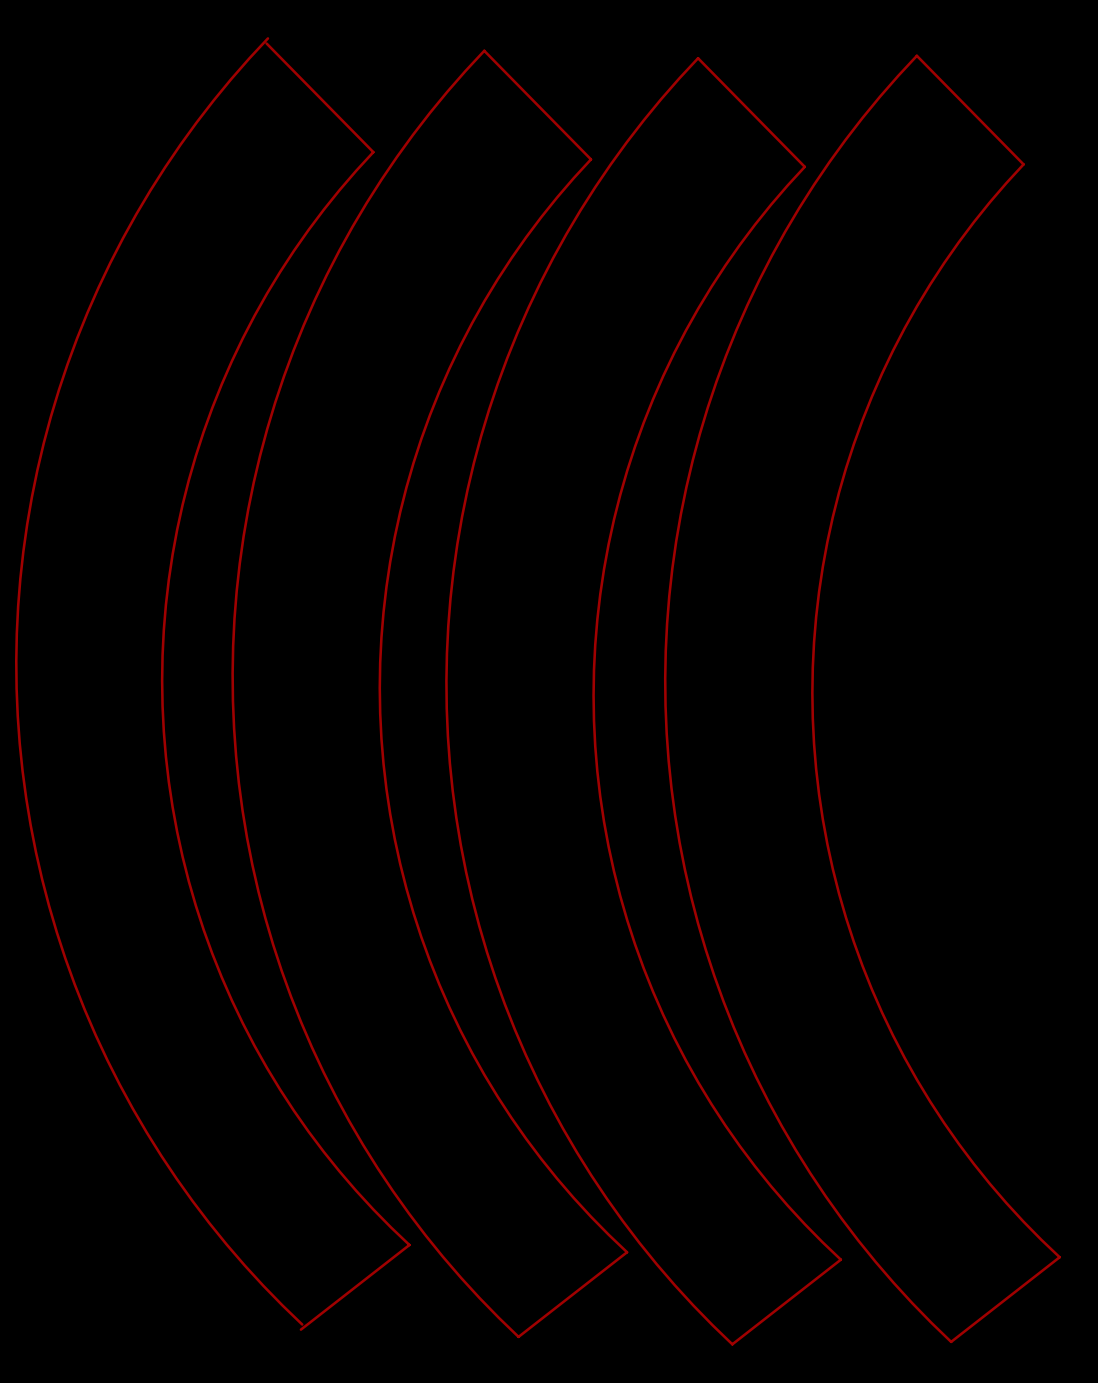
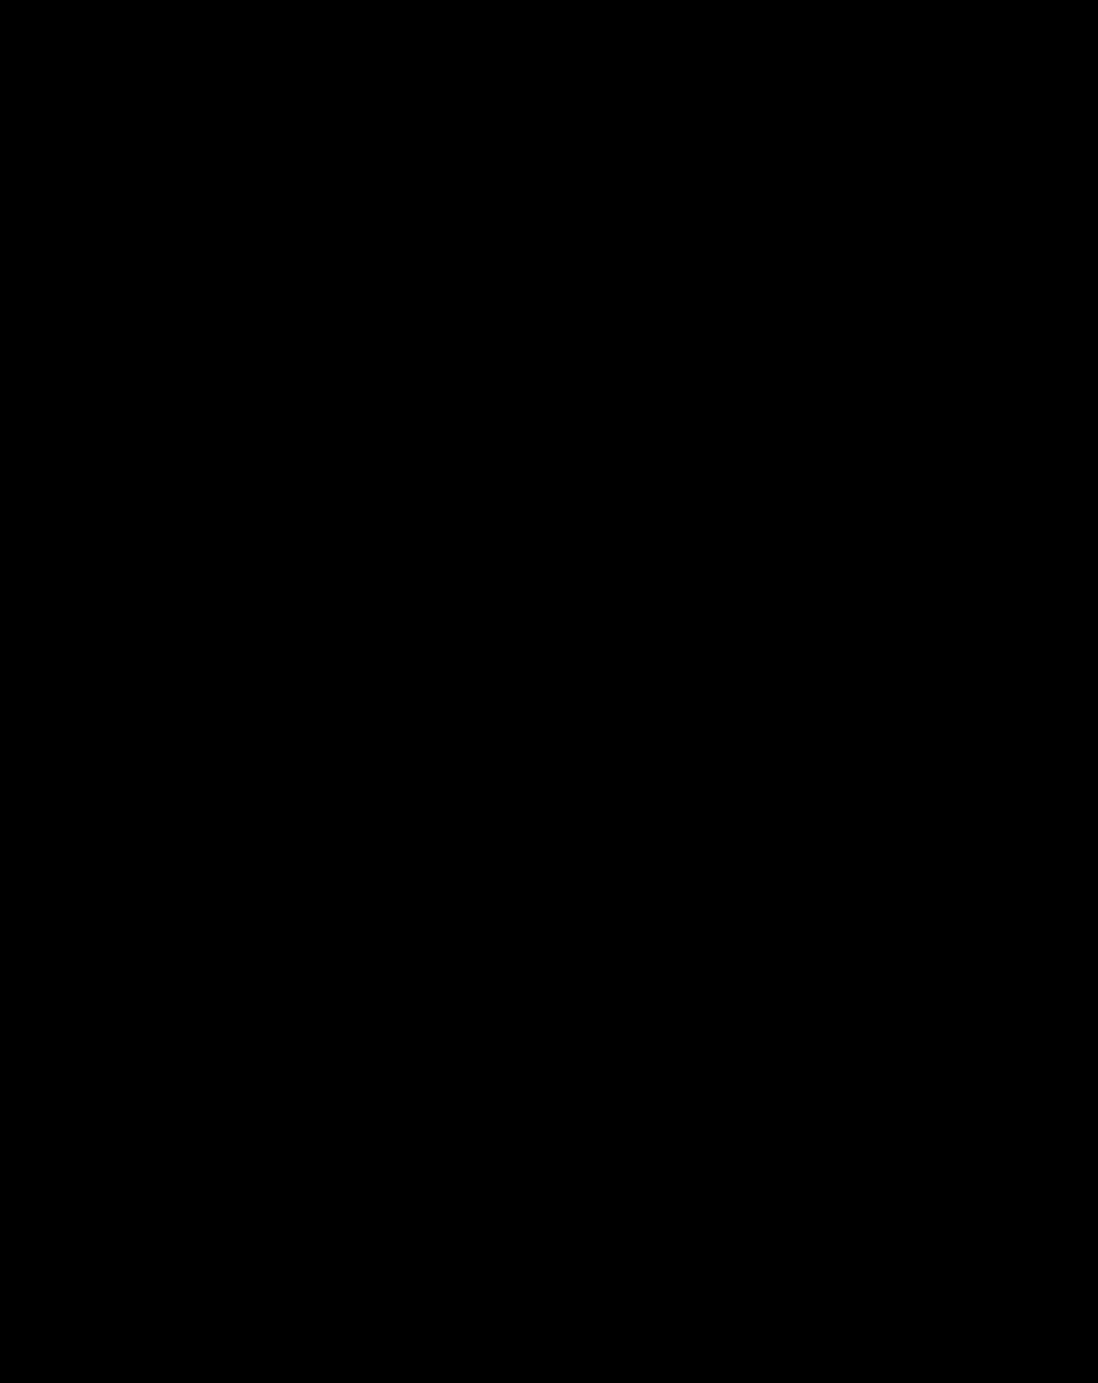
top track: (267, 38) (231, 79) (196, 122) (150, 190) (110, 262) (77, 338) (50, 416) (31, 496) (20, 578) (16, 633) (16, 688) (19, 743) (26, 798) (42, 879) (65, 958) (95, 1035) (119, 1084) (146, 1132) (192, 1201) (244, 1265) (302, 1324) -> none
top track: (266, 43) (373, 152) (323, 209) (280, 272) (242, 338) (212, 407) (188, 480) (172, 554) (163, 630) (162, 706) (168, 781) (182, 856) (203, 929) (231, 1000) (266, 1067) (308, 1131) (356, 1190) (409, 1244) (300, 1329) -> none
top track: (484, 50) (590, 159) (541, 217) (497, 279) (460, 345) (429, 415) (406, 487) (390, 561) (381, 637) (380, 713) (386, 789) (400, 863) (421, 937) (449, 1007) (484, 1075) (526, 1138) (573, 1198) (627, 1252) (518, 1336) (479, 1298) (443, 1256) (393, 1191) (349, 1121) (312, 1047) (281, 970) (258, 891) (247, 837) (238, 783) (232, 701) (234, 618) (243, 536) (253, 482) (267, 428) (293, 350) (326, 275) (366, 202) (396, 156) (429, 112) (484, 50) -> none
top track: (916, 55) (1023, 164) (973, 222) (930, 284) (893, 350) (862, 420) (839, 492) (822, 566) (814, 642) (812, 718) (819, 794) (832, 868) (853, 942) (882, 1012) (917, 1080) (958, 1143) (1006, 1203) (1059, 1257) (951, 1341) (912, 1303) (875, 1261) (825, 1196) (781, 1126) (744, 1052) (723, 1001) (705, 949) (684, 869) (671, 788) (665, 706) (667, 623) (676, 541) (692, 460) (707, 407) (726, 355) (759, 280) (799, 207) (829, 161) (862, 117) (916, 55) -> none
top track: (698, 58) (804, 166) (755, 224) (711, 286) (674, 353) (643, 422) (620, 494) (604, 569) (595, 644) (593, 720) (600, 796) (614, 871) (635, 944) (663, 1015) (698, 1082) (739, 1146) (787, 1205) (840, 1259) (732, 1344) (693, 1305) (656, 1264) (606, 1198) (563, 1128) (525, 1055) (495, 978) (472, 899) (456, 818) (449, 763) (446, 708) (446, 653) (450, 598) (462, 516) (481, 436) (507, 358) (540, 282) (580, 210) (610, 164) (643, 120) (698, 58) -> none

